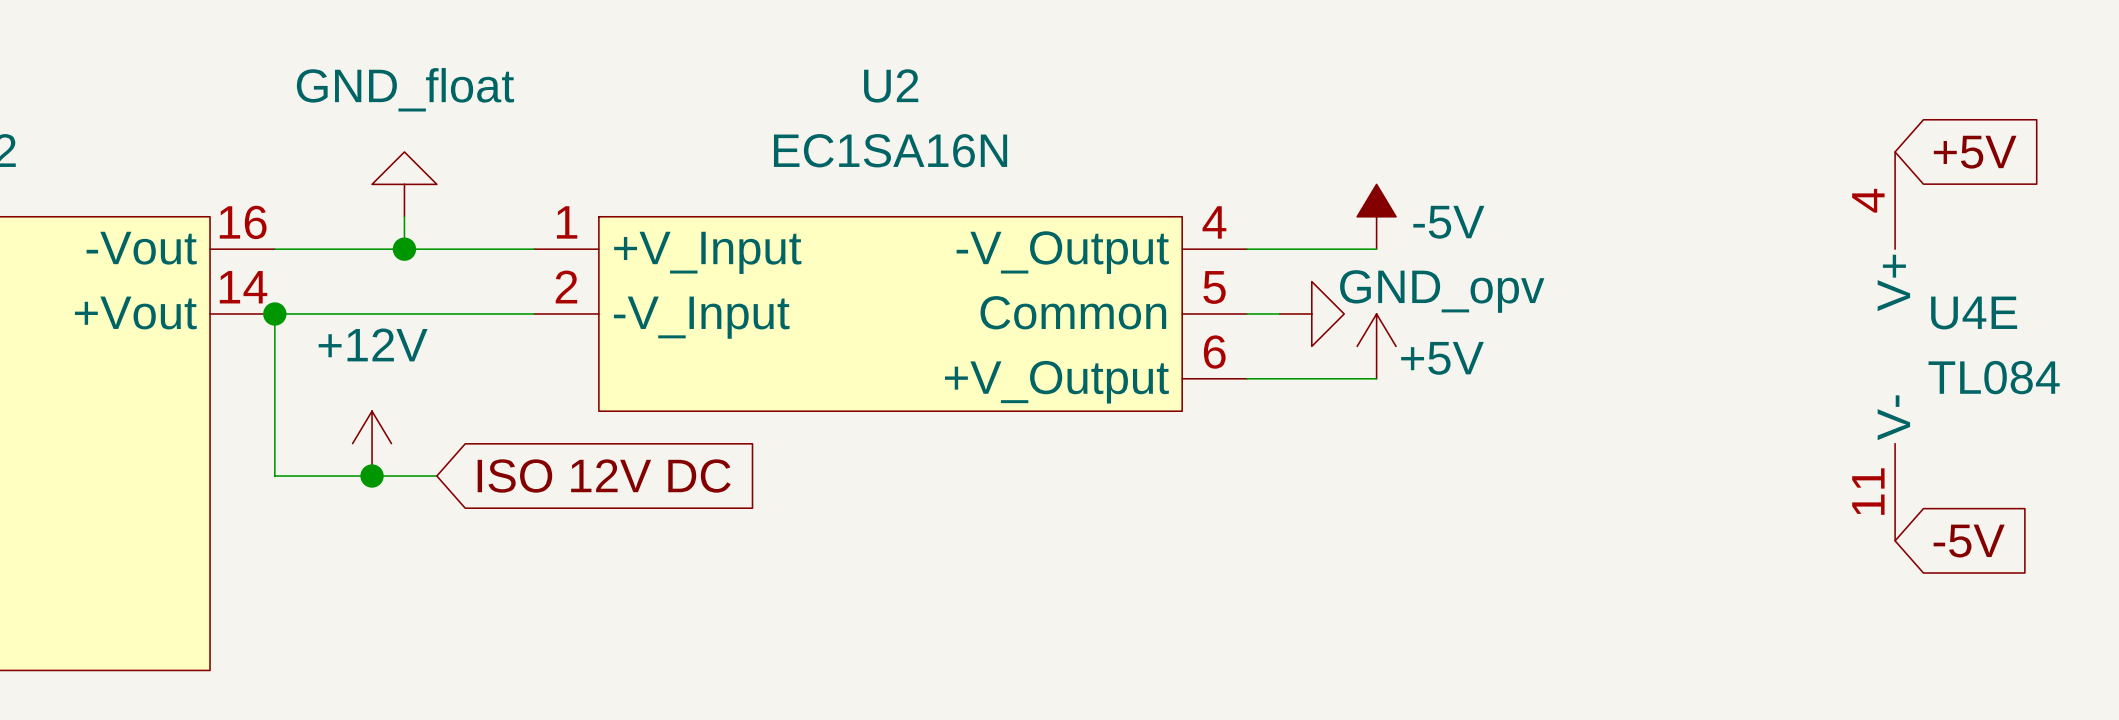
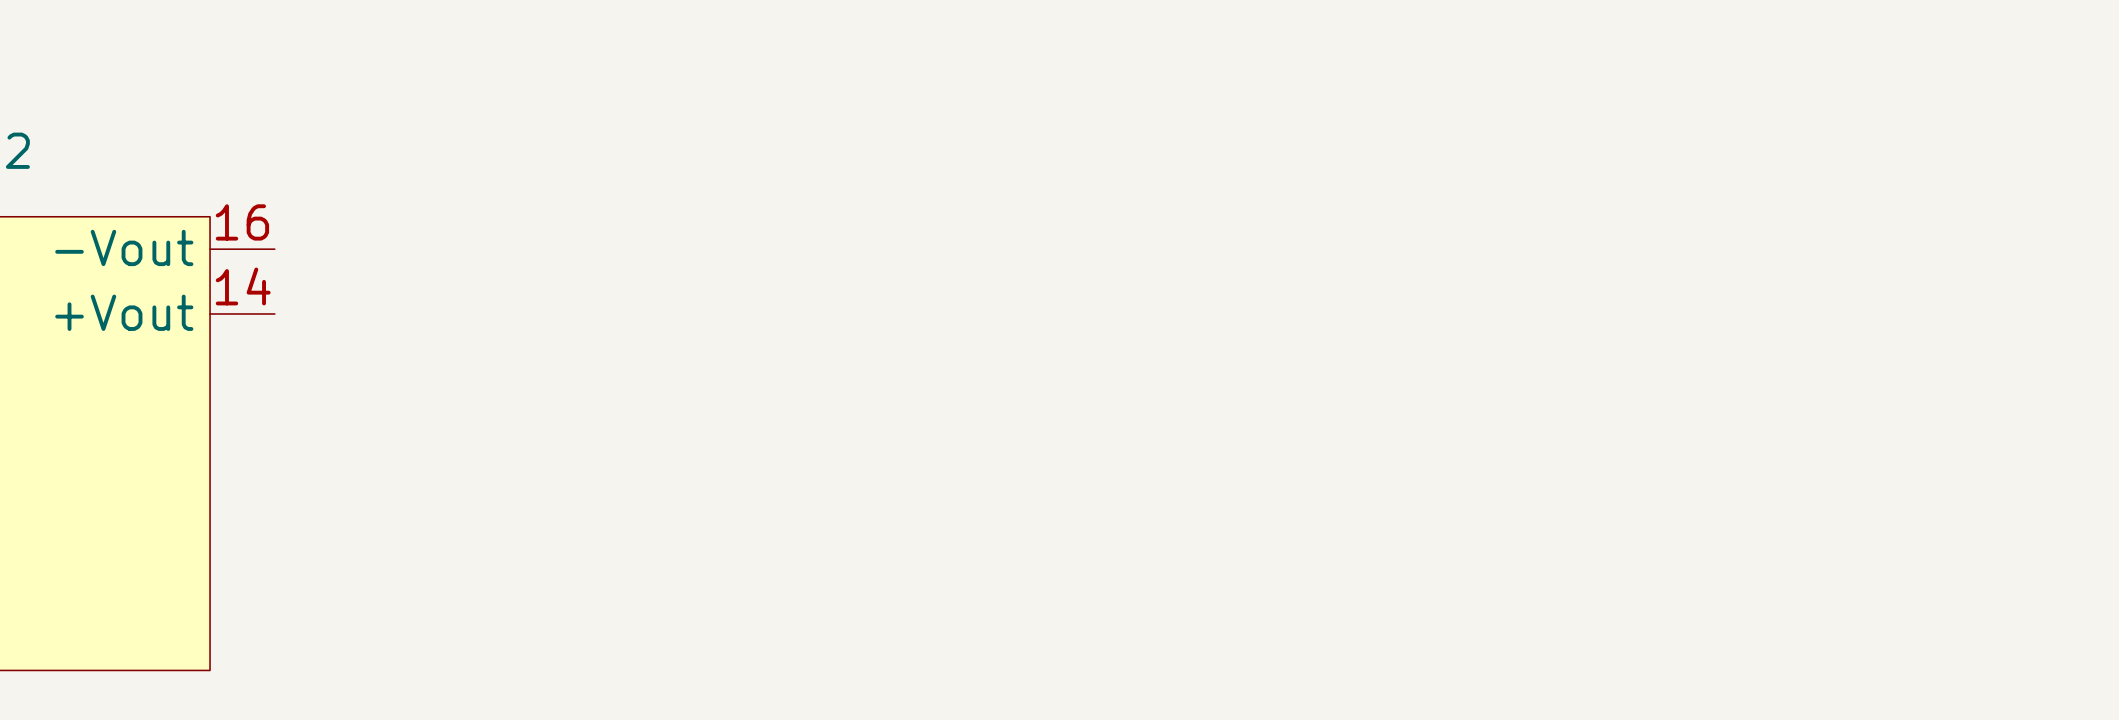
global label: +5V (1975, 152) -> none
power symbol: GND_float (404, 184) -> none
wire: (404, 216) (404, 249) -> none
power symbol: -5V (1376, 216) -> none
wire: (274, 249) (534, 249) -> none
junction: (404, 249) -> none
wire: (1246, 249) (1376, 249) -> none
junction: (274, 313) -> none
wire: (534, 313) (274, 313) (274, 476) (436, 476) -> none
U2: EC1SA16N (890, 313) -> none
wire: (1246, 313) (1279, 313) -> none
power symbol: GND_opv (1311, 313) -> none
power symbol: +5V (1376, 346) -> none
U4E: TL084 (1895, 346) -> none
wire: (1246, 378) (1376, 378) -> none
power symbol: +12V (372, 443) -> none
junction: (372, 476) -> none
global label: ISO 12V DC (604, 476) -> none
global label: -5V (1969, 541) -> none

